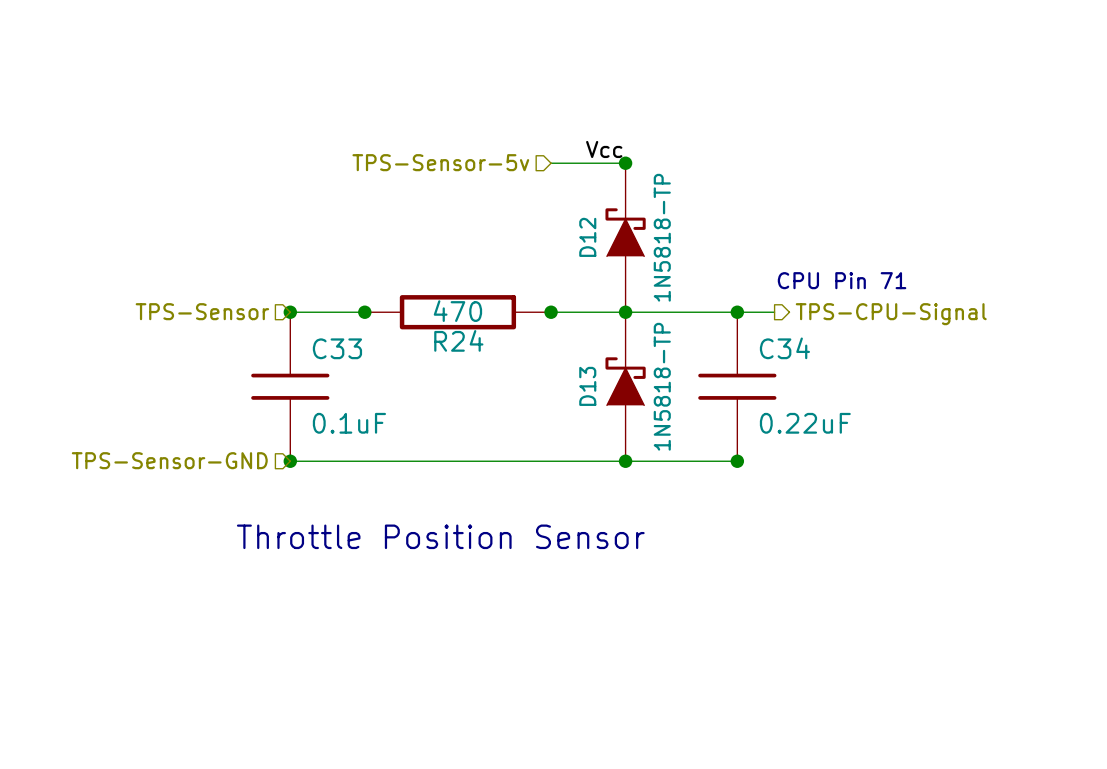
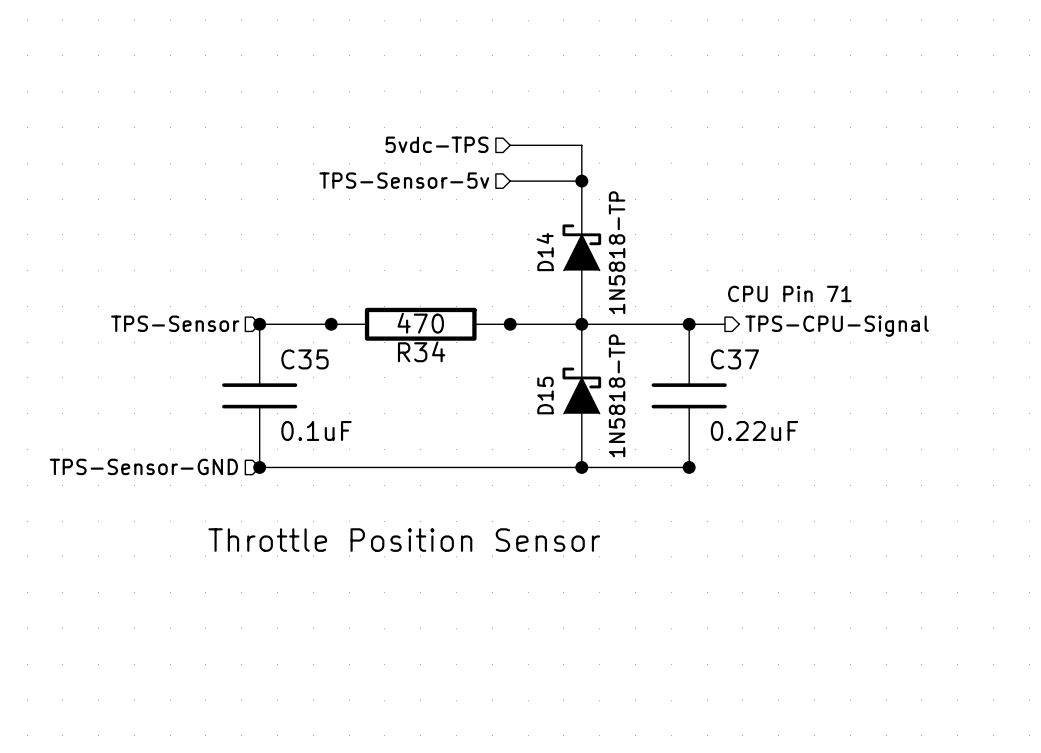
hierarchical label: none -> 5vdc-TPS (437, 144)
wire: none -> (510, 145) (581, 145) (581, 181)
label: Vcc (604, 149) -> none
D12 name: D12 (587, 237) -> D14 (545, 252)
R24 name: R24 (458, 340) -> R34 (421, 351)
C33 name: C33 (337, 348) -> C35 (304, 359)
C34 name: C34 (784, 348) -> C37 (734, 359)
D13 name: D13 (587, 386) -> D15 (545, 395)

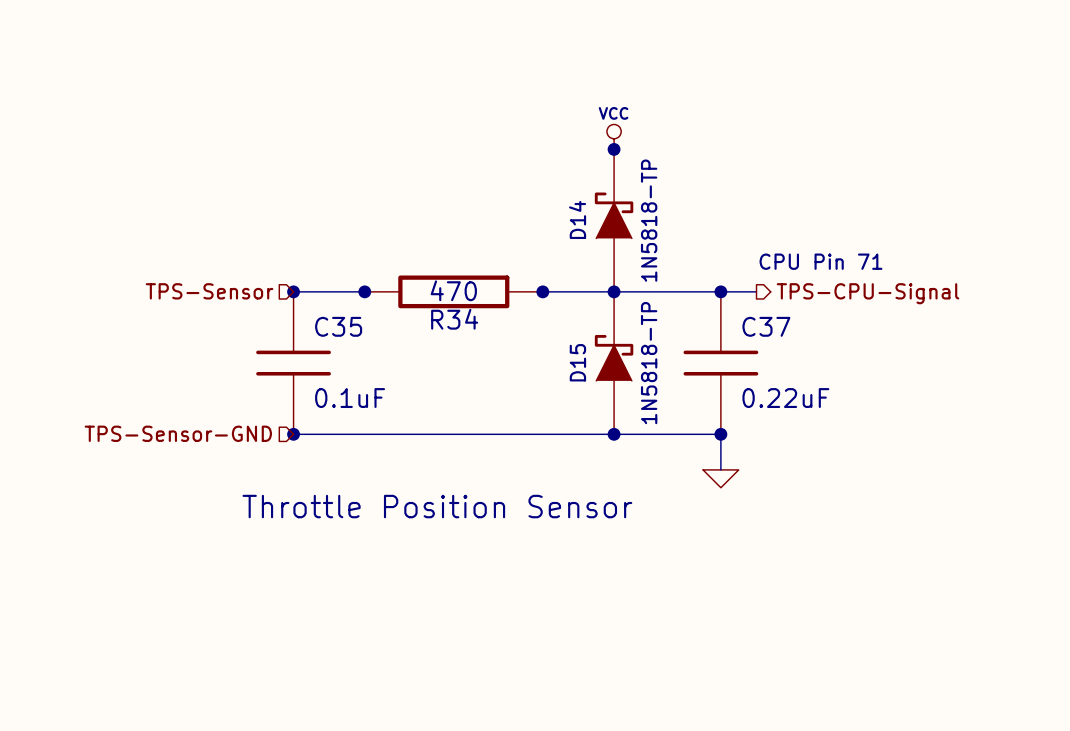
hierarchical label: 5vdc-TPS (437, 144) -> none
wire: (510, 145) (581, 145) (581, 181) (510, 181) -> none
power symbol: none -> VCC (614, 136)
hierarchical label: TPS-Sensor-5v (404, 180) -> none
wire: none -> (720, 434) (720, 469)
power symbol: none -> (720, 478)

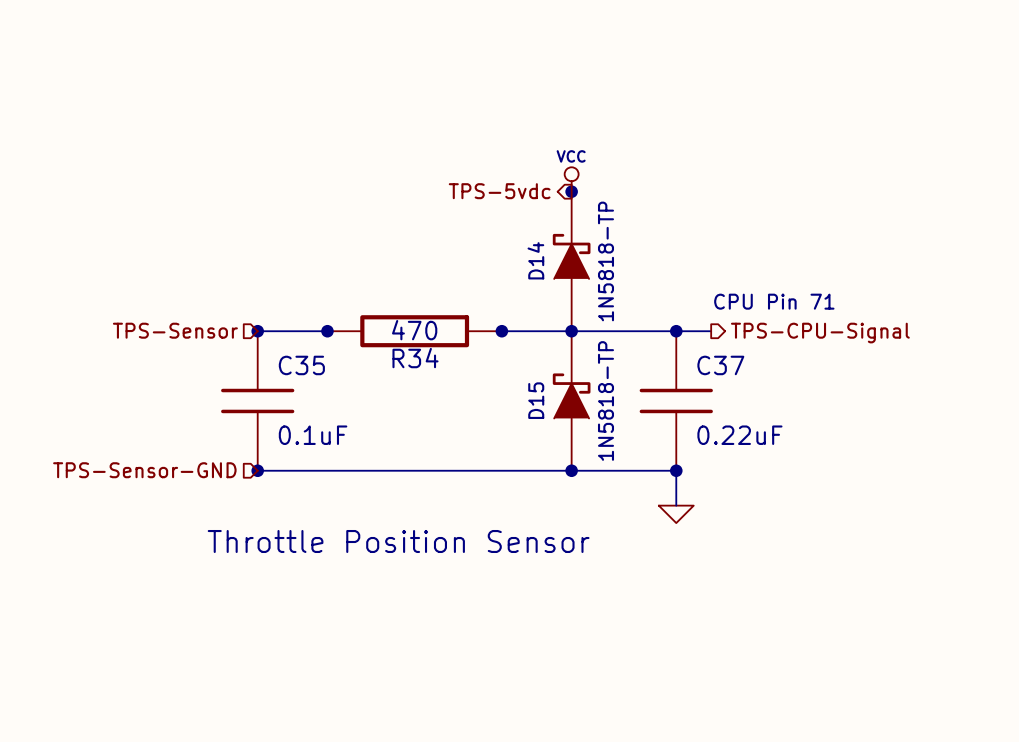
hierarchical label: none -> TPS-5vdc (499, 191)

